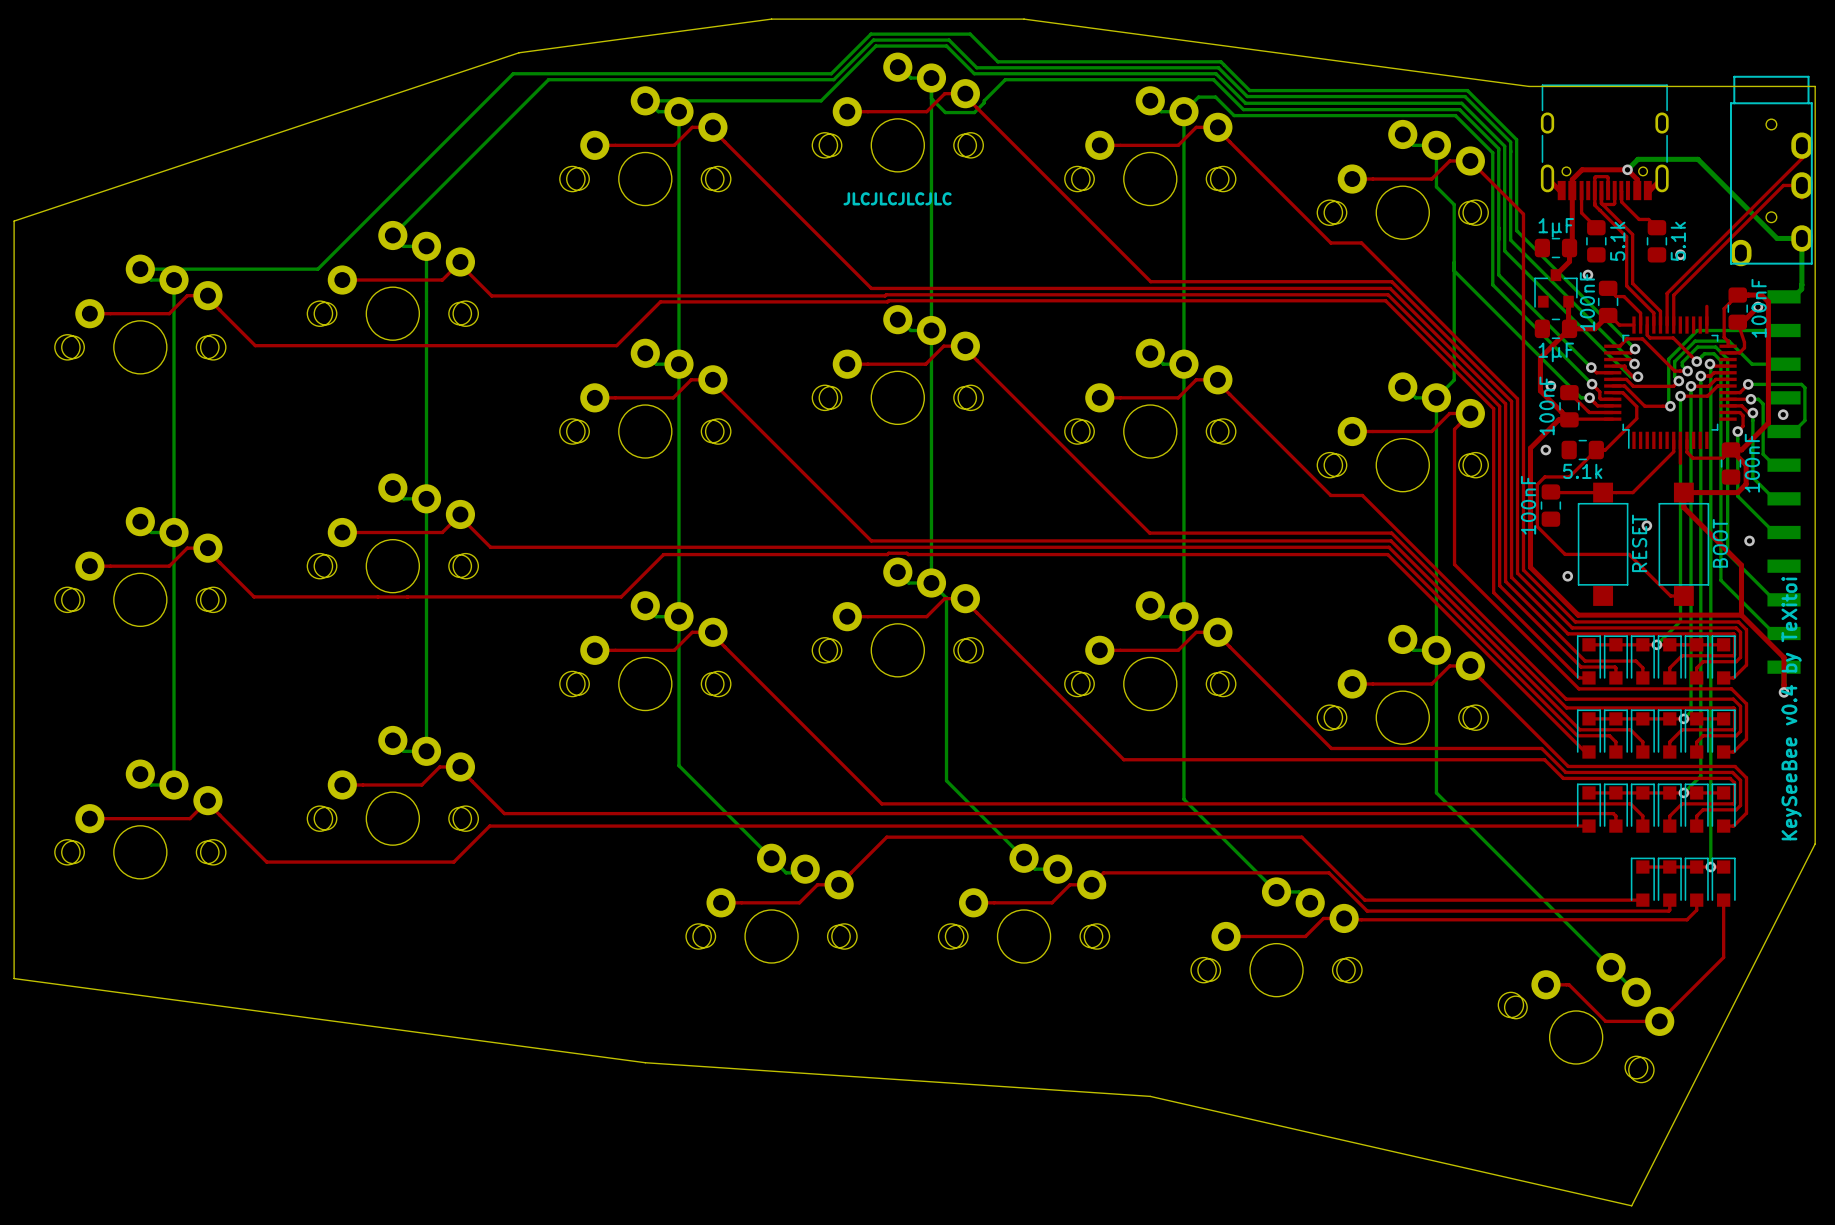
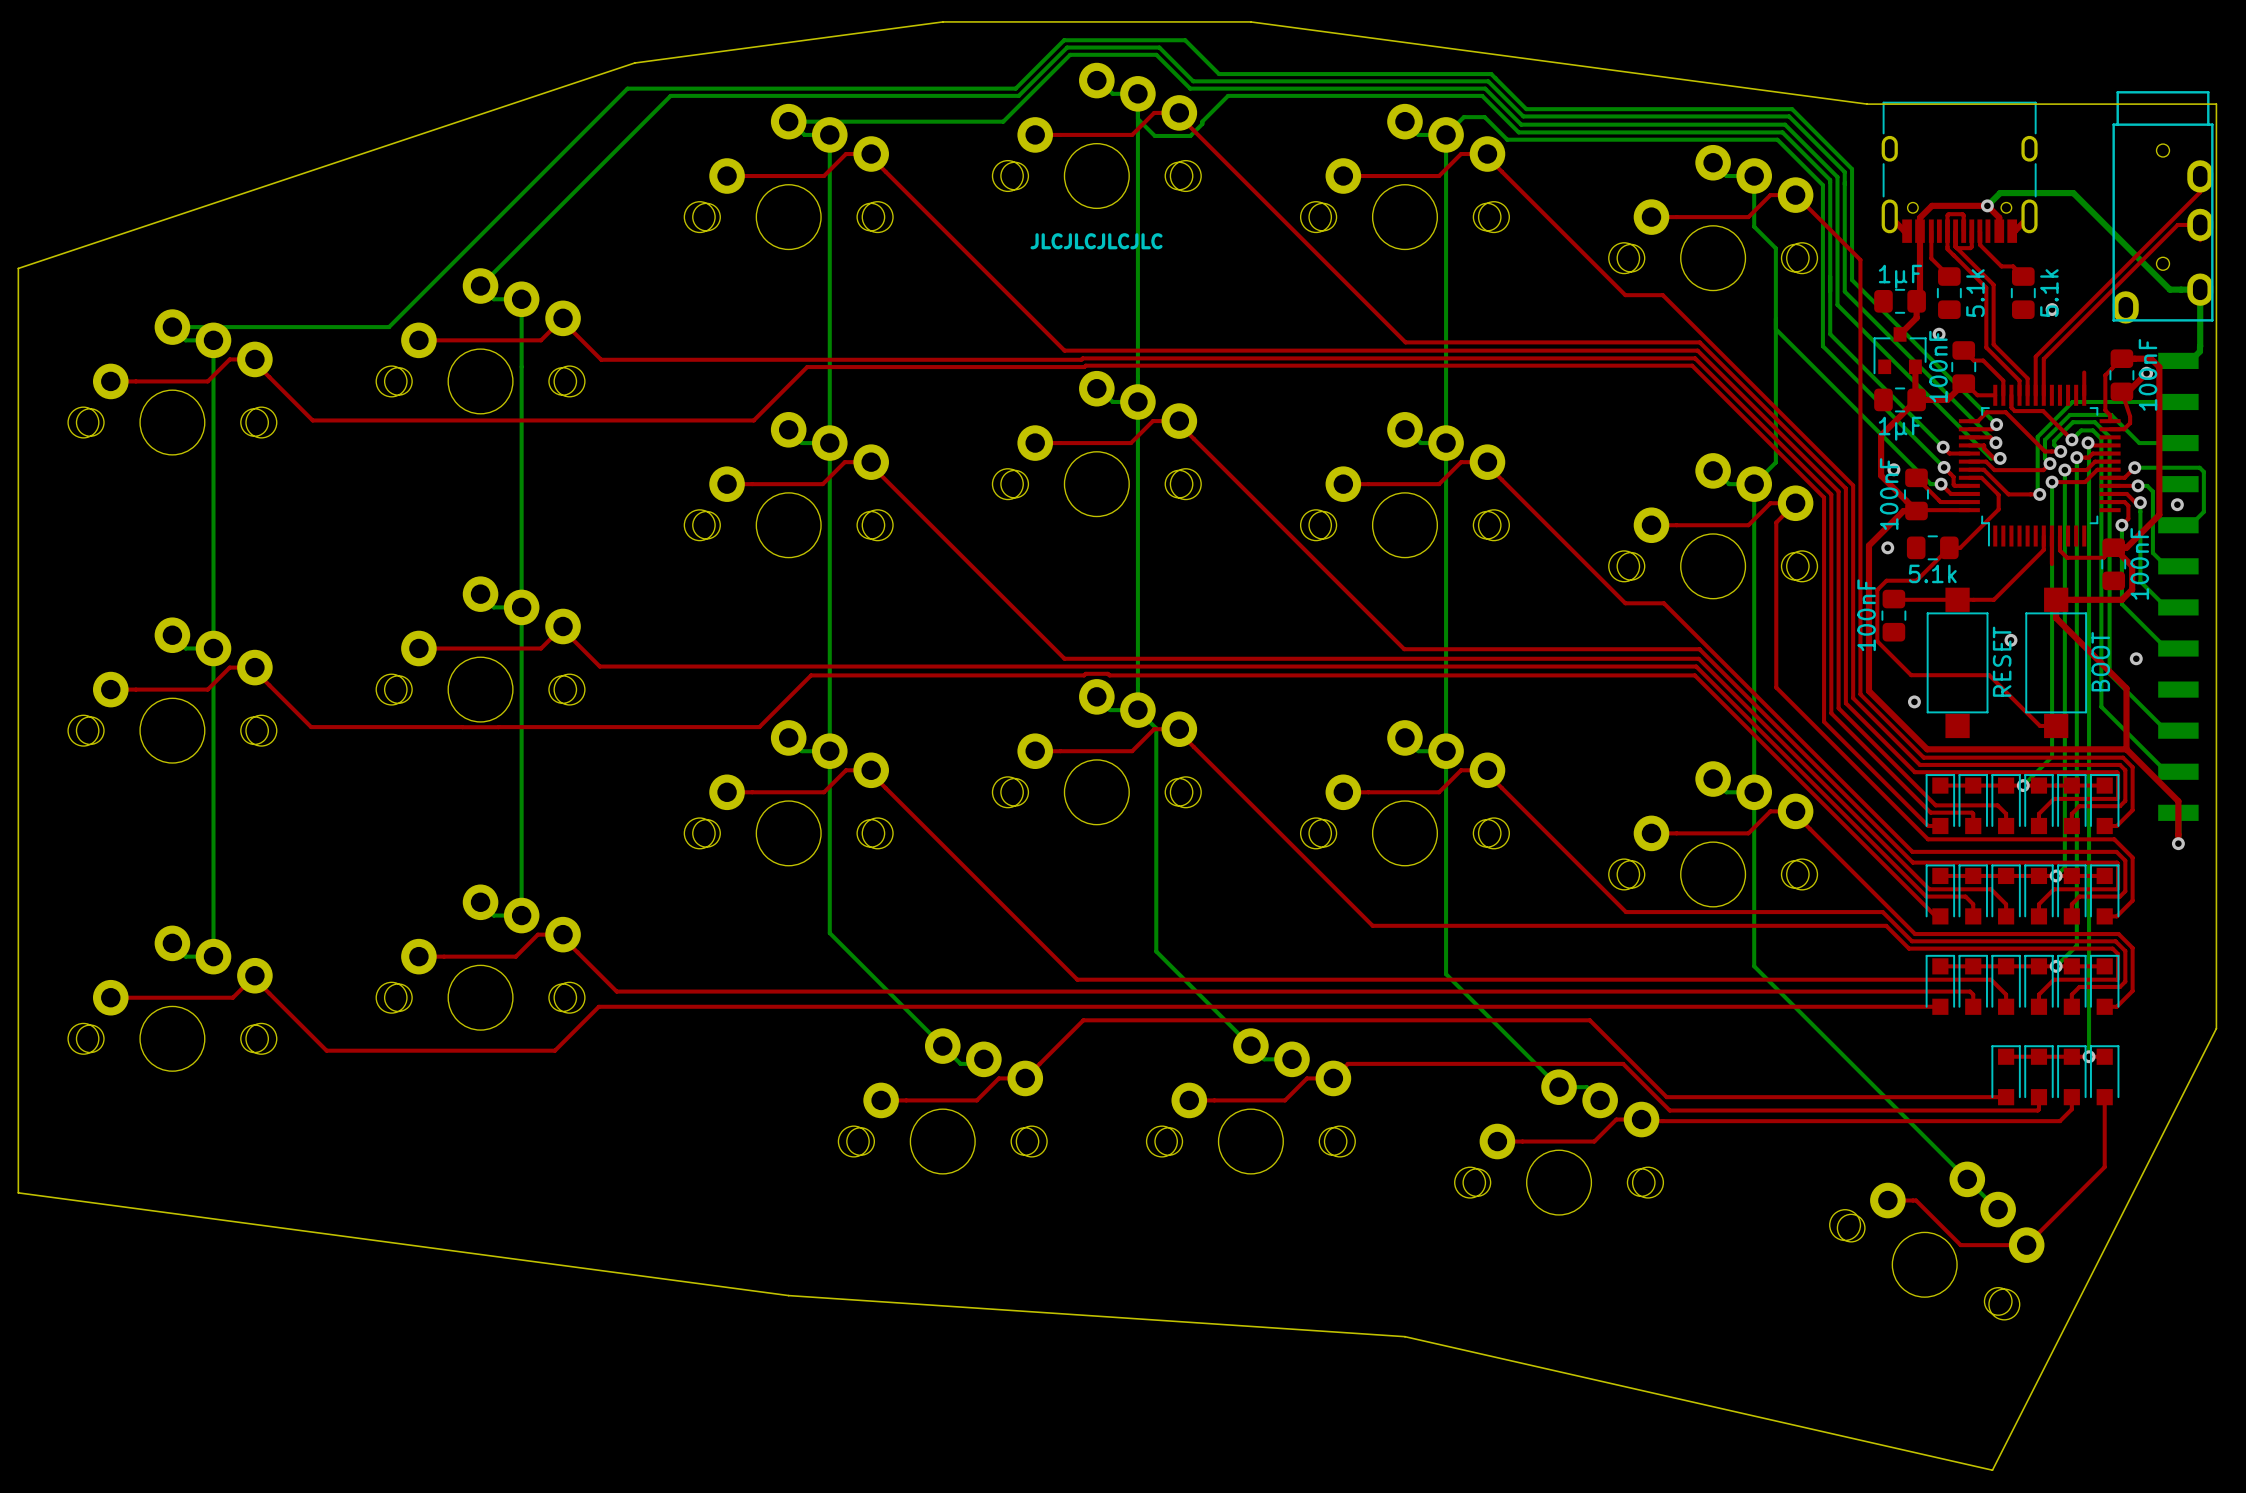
text: KeySeeBee v0.4 by TeXitoi (1791, 708) -> none

